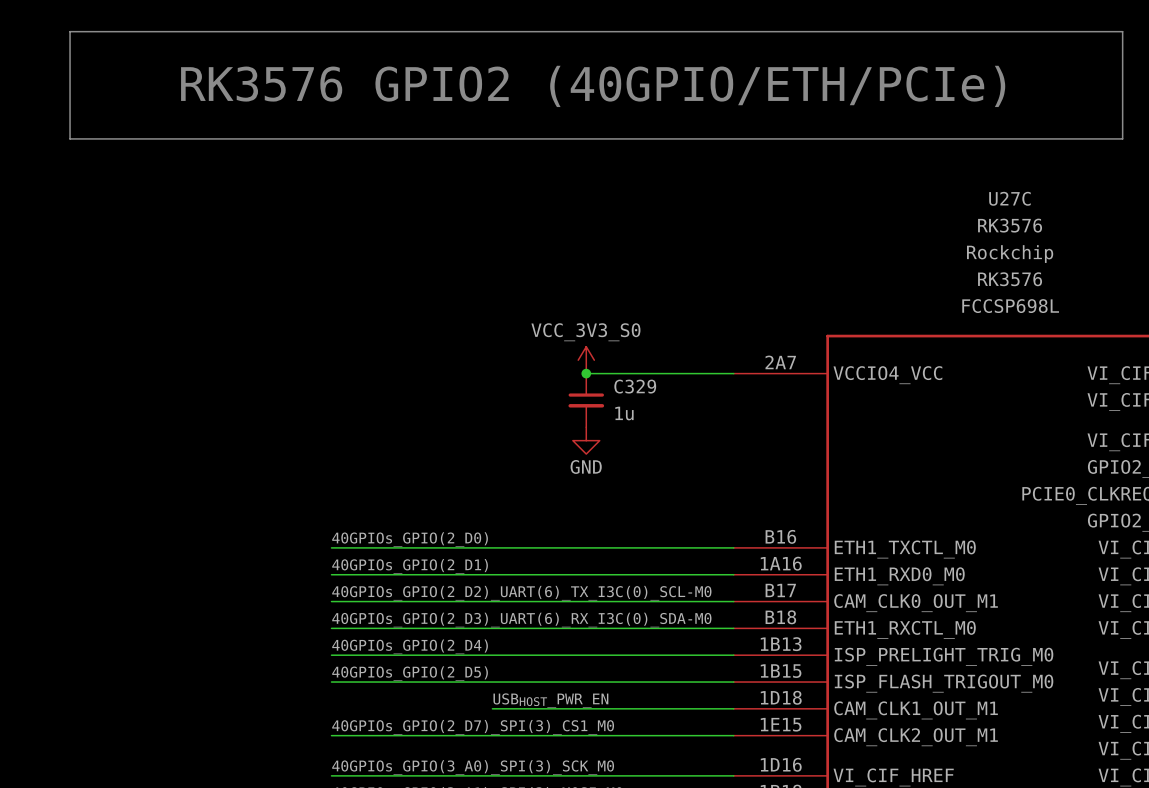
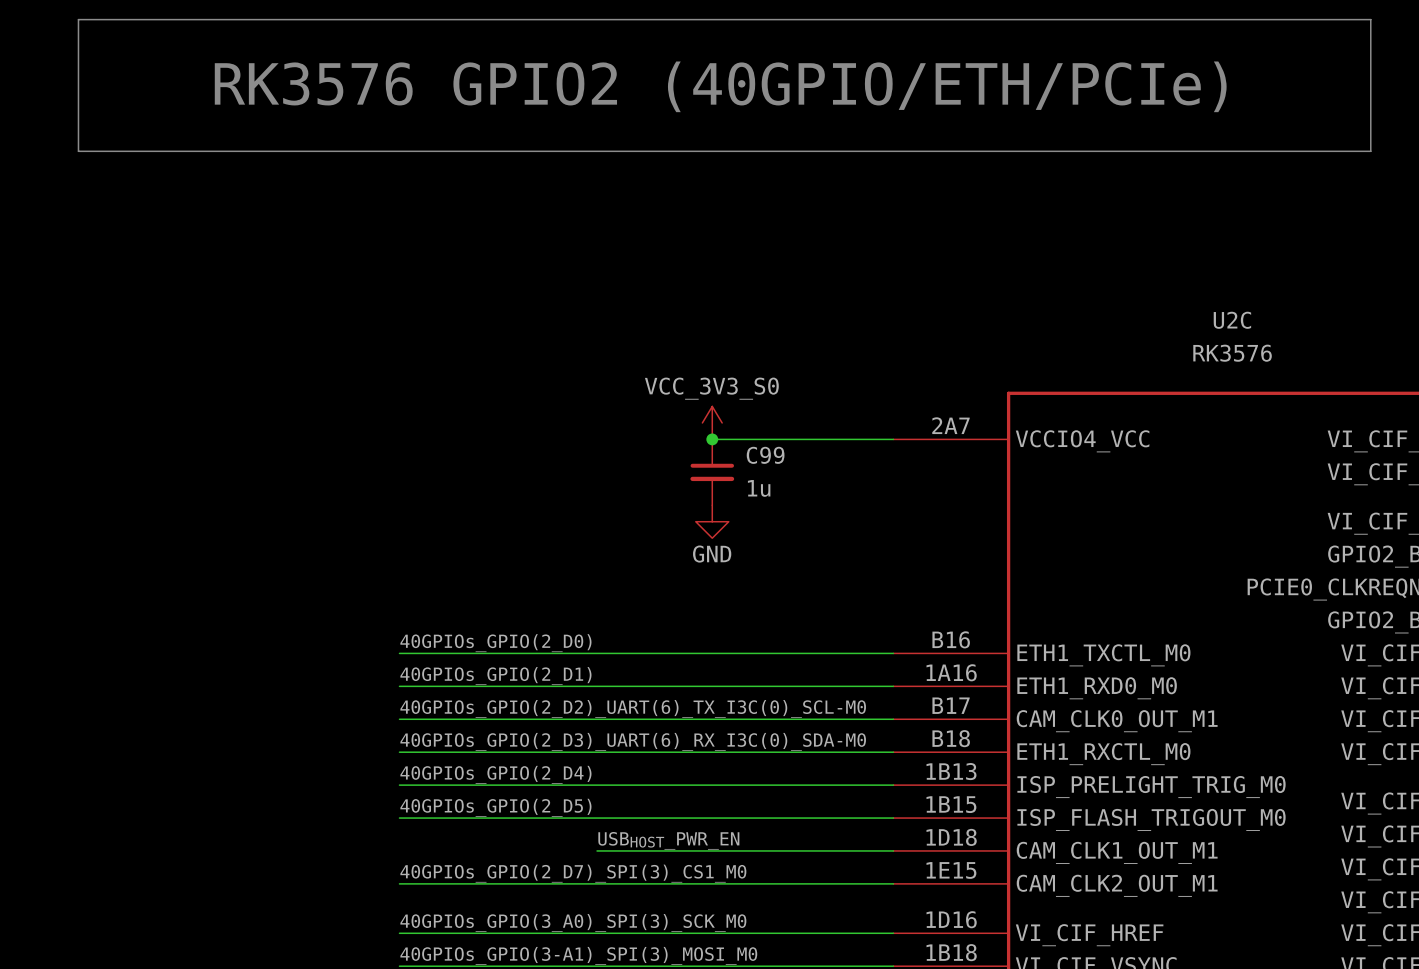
U27C name: U27C (1009, 198) -> U2C (1232, 320)
U27C value position: RK3576 (1010, 225) -> RK3576 (1232, 353)
U27C text: Rockchip (1010, 254) -> none
U27C text: RK3576 (1010, 279) -> none
U27C text: FCCSP698L (1010, 306) -> none
C329 name: C329 (635, 386) -> C99 (765, 455)

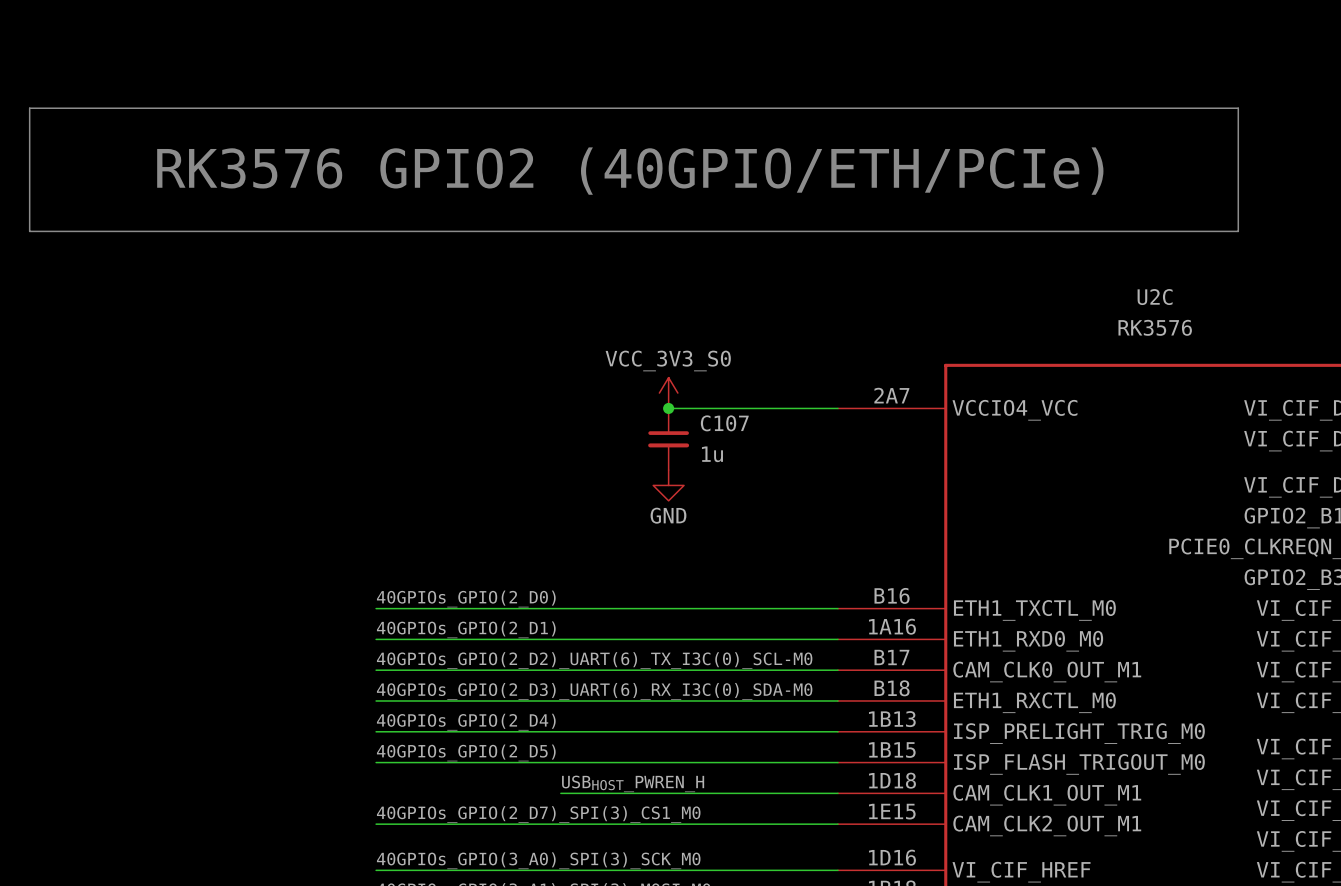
line: (78, 19) (1370, 19) (1370, 151) (78, 151) (78, 19) -> (29, 108) (1238, 108) (1238, 231) (29, 231) (29, 108)
text position: RK3576 GPIO2 (40GPIO/ETH/PCIe) (720, 86) -> RK3576 GPIO2 (40GPIO/ETH/PCIe) (630, 171)
C99 name: C99 (765, 455) -> C107 (724, 423)
label: USBHOST_PWR_EN (668, 840) -> USBHOST_PWREN_H (633, 783)

